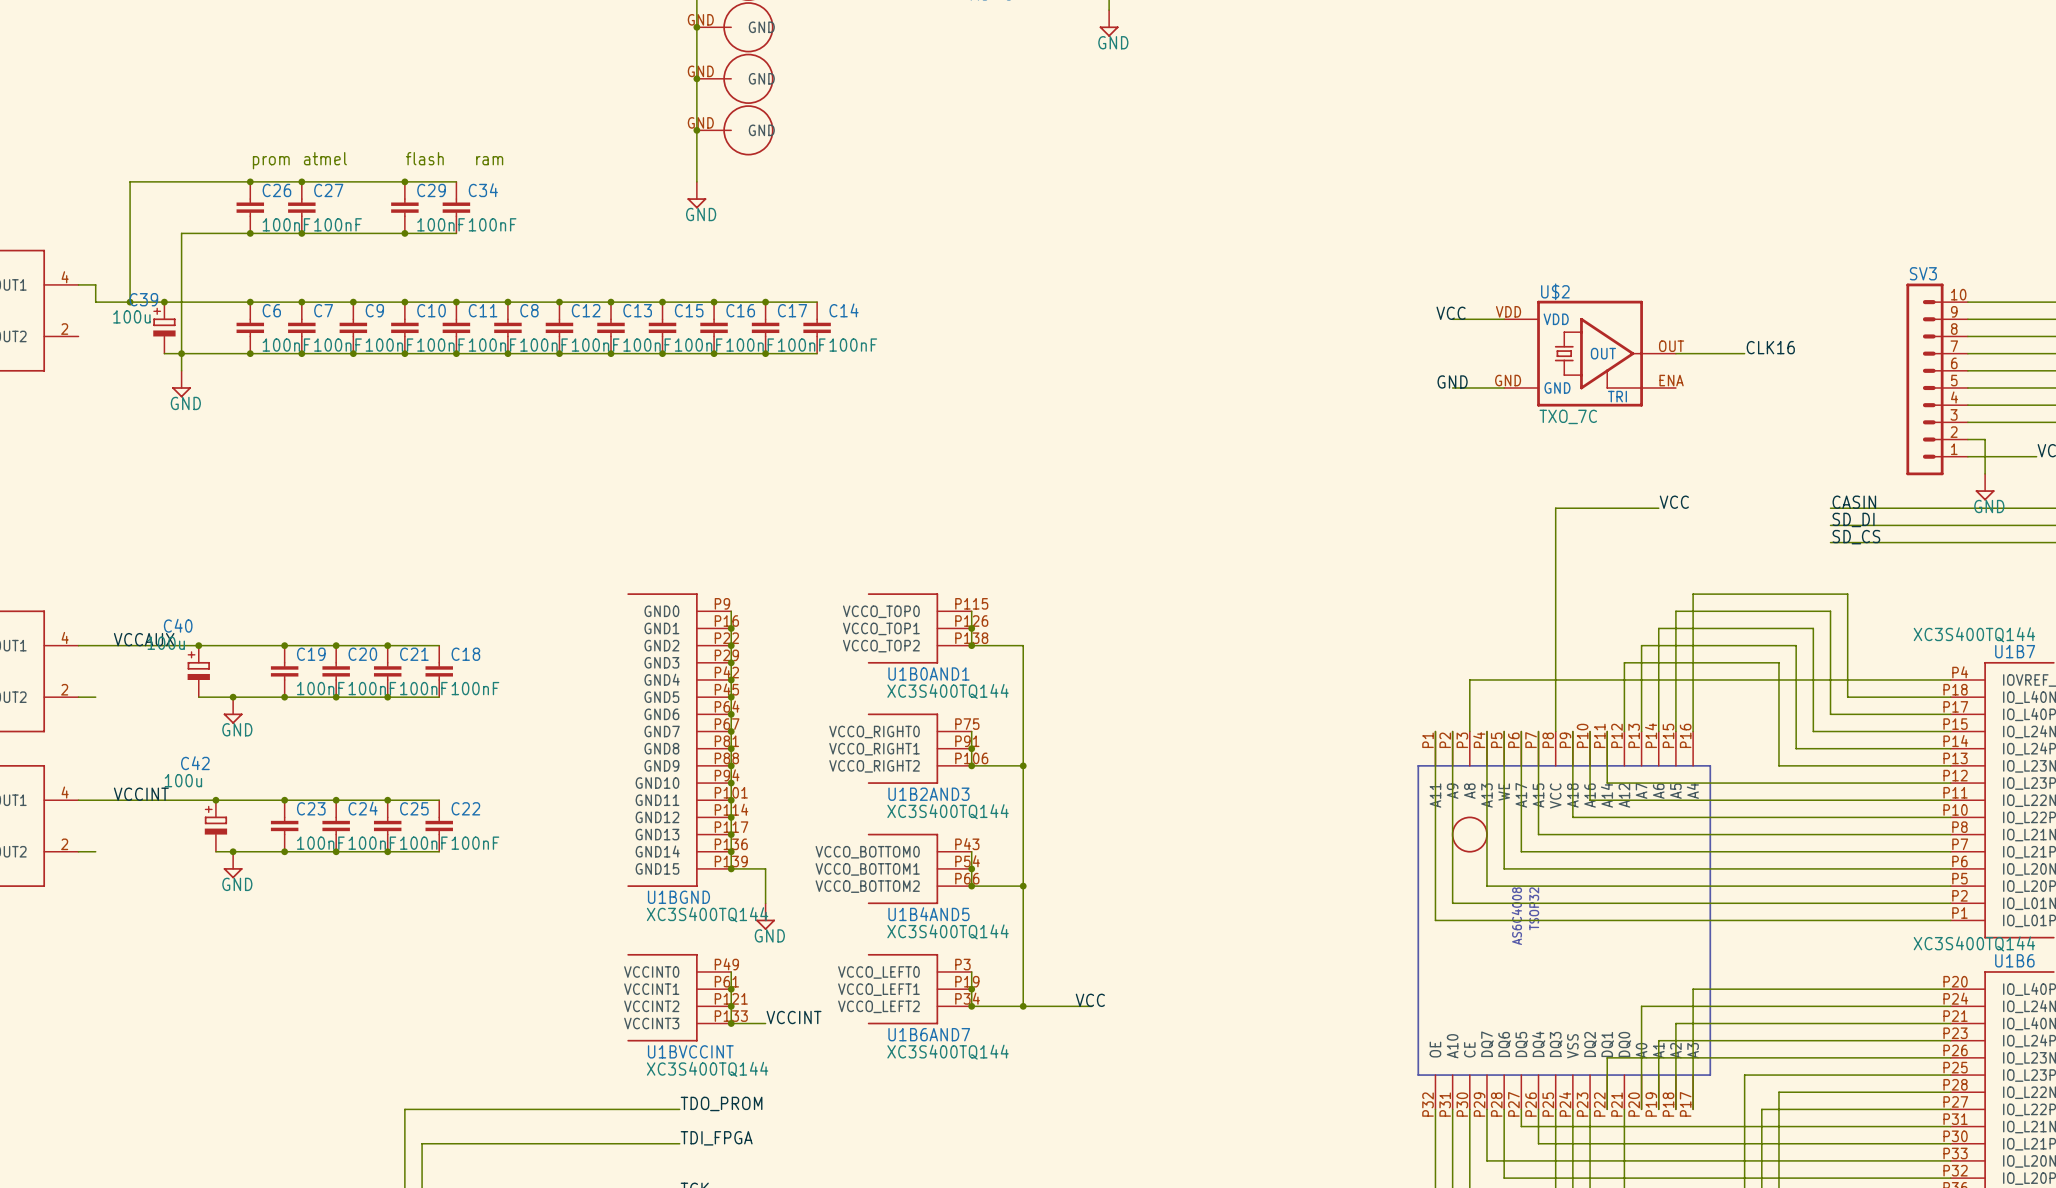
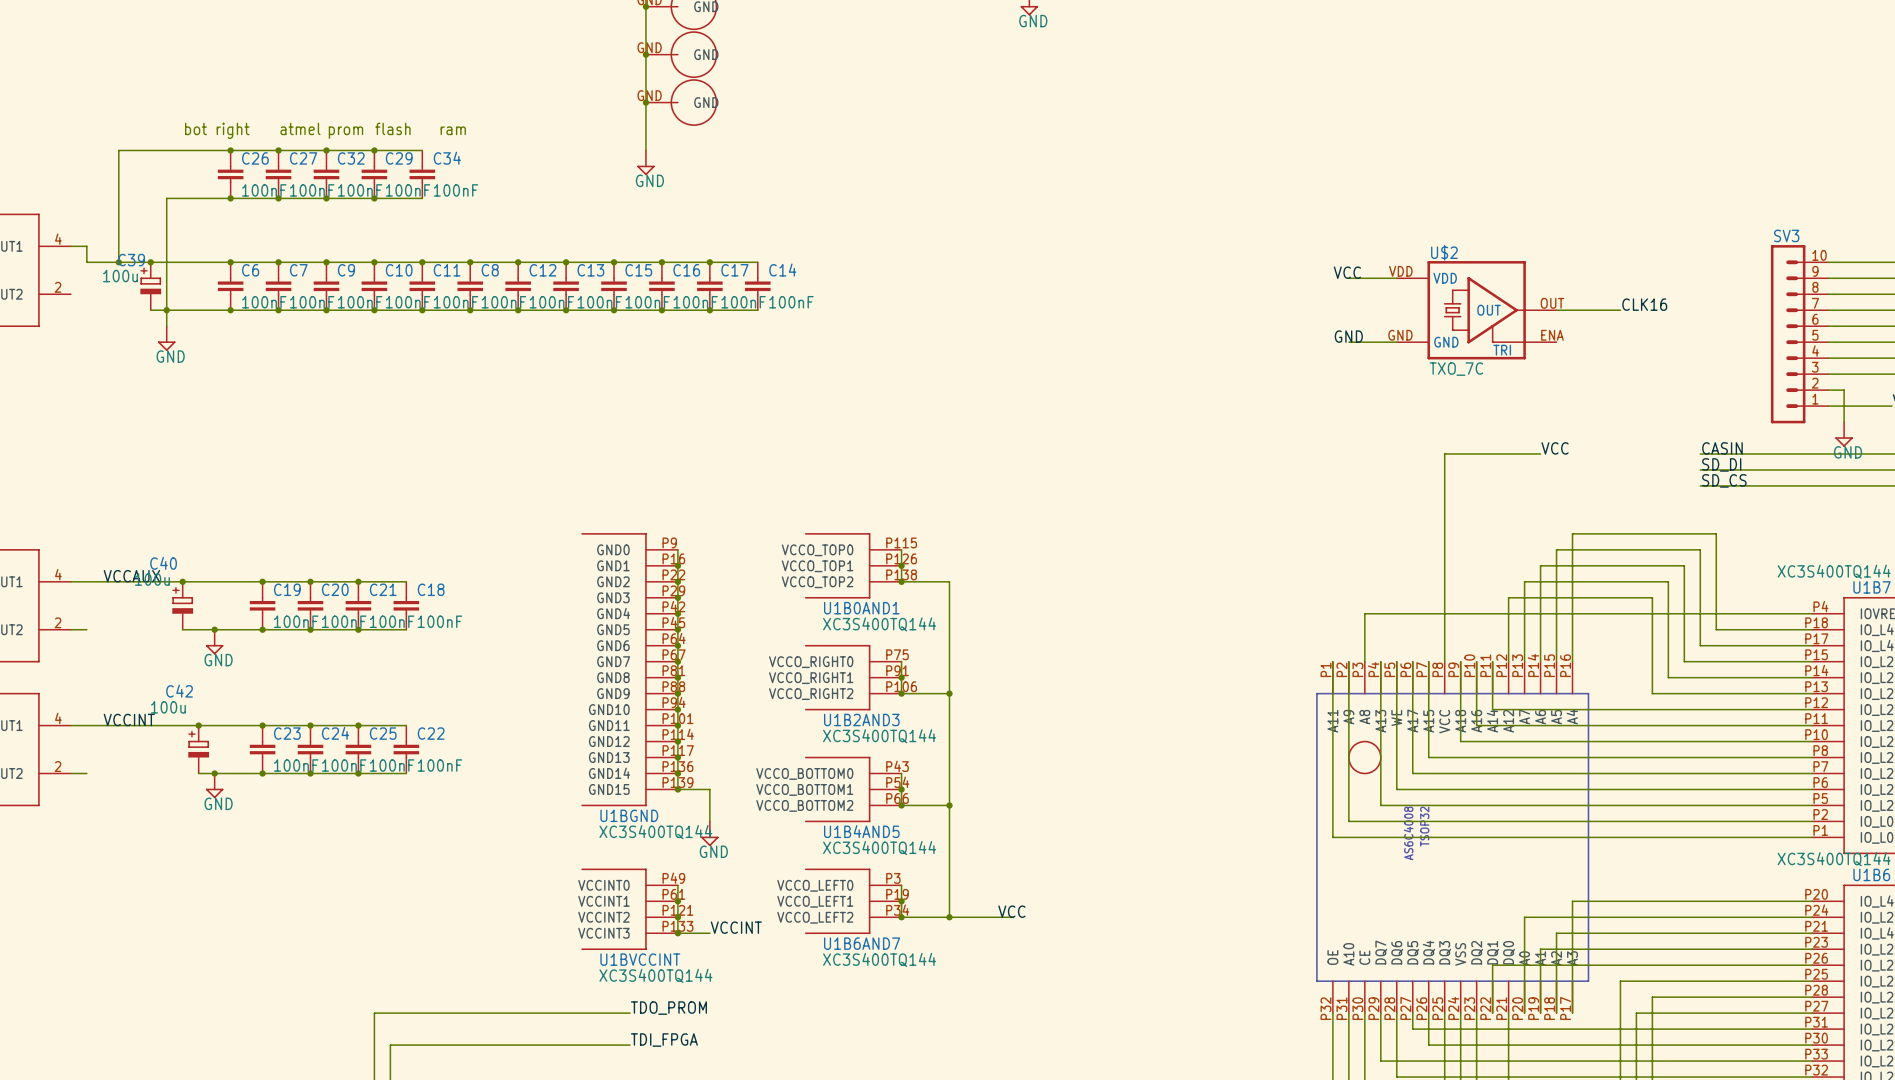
text: none -> bot right (217, 130)
text position: prom (271, 162) -> prom (345, 132)
junction: none -> (326, 150)
C32: none -> 100nF (326, 174)
junction: none -> (326, 198)

